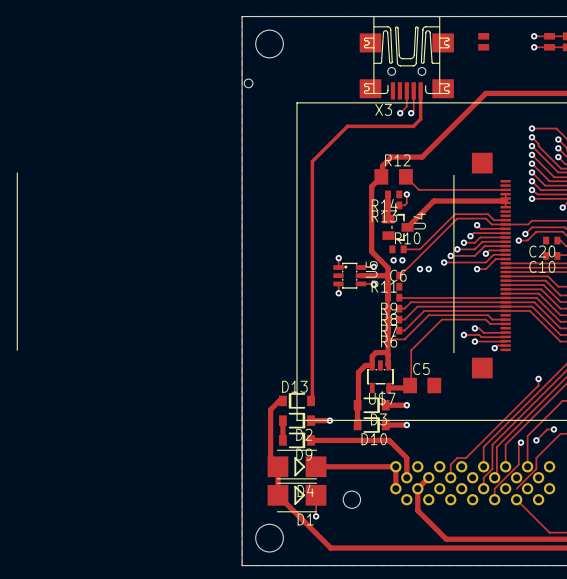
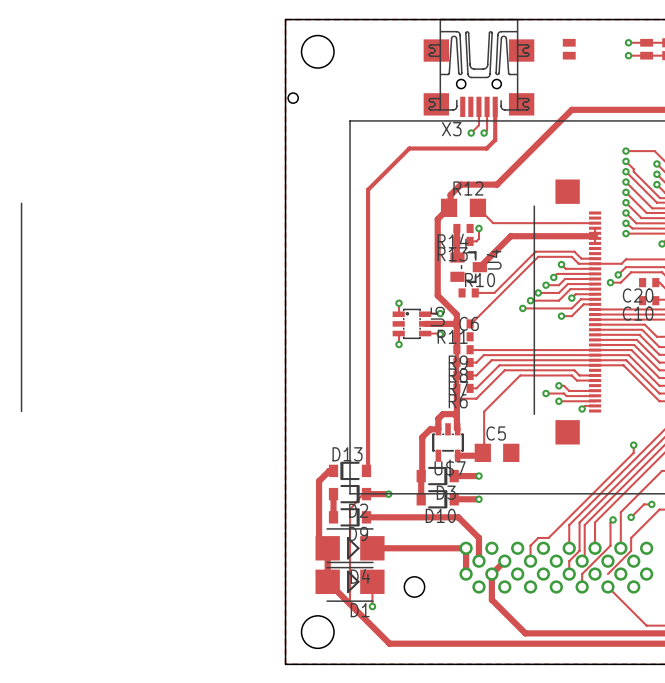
via: (393, 260) -> none
via: (402, 260) -> none
via: (419, 269) -> none
via: (428, 269) -> none
track: none -> (366, 494) (362, 494) (350, 509) (350, 605) (370, 625)

